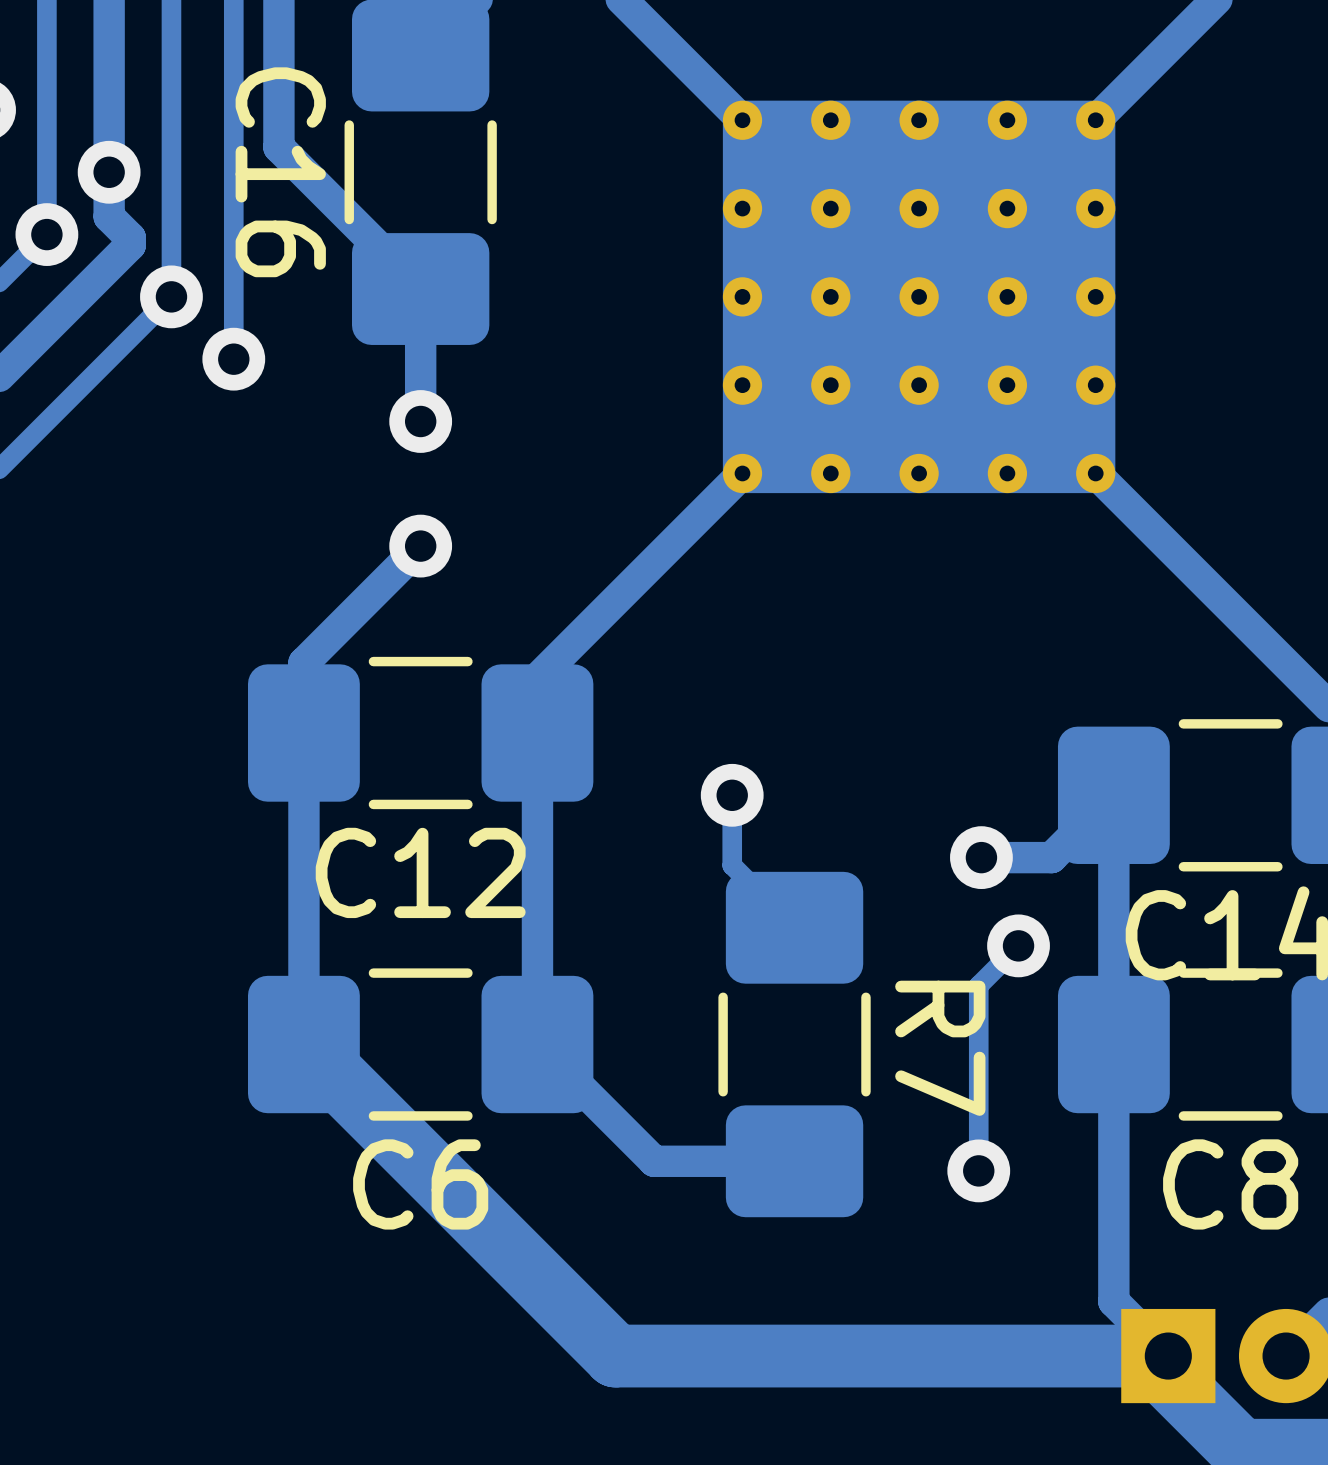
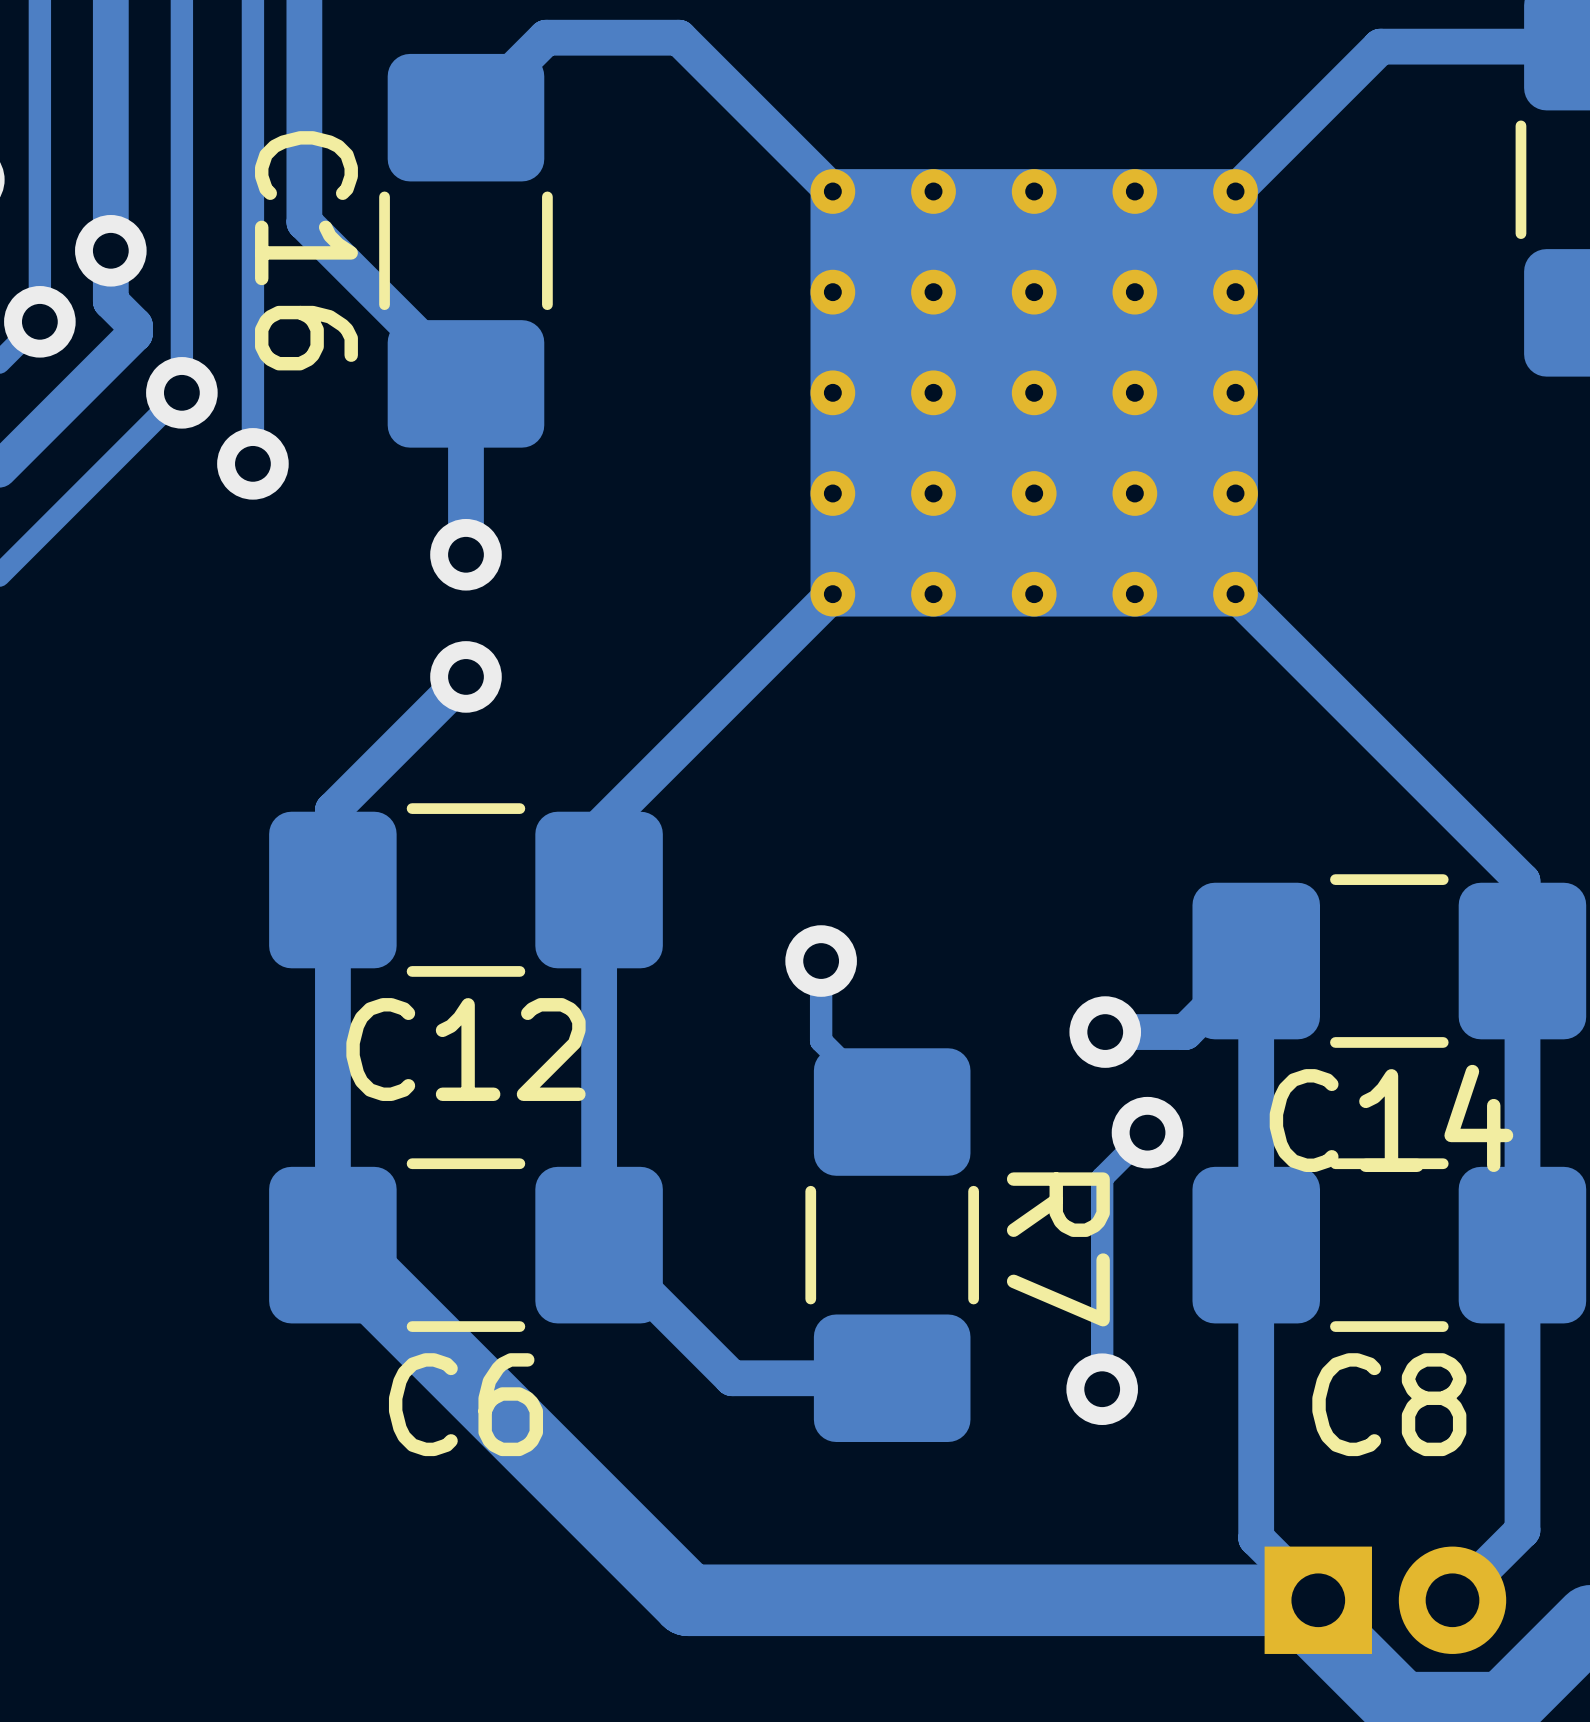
via position: (420, 421) -> (465, 554)

